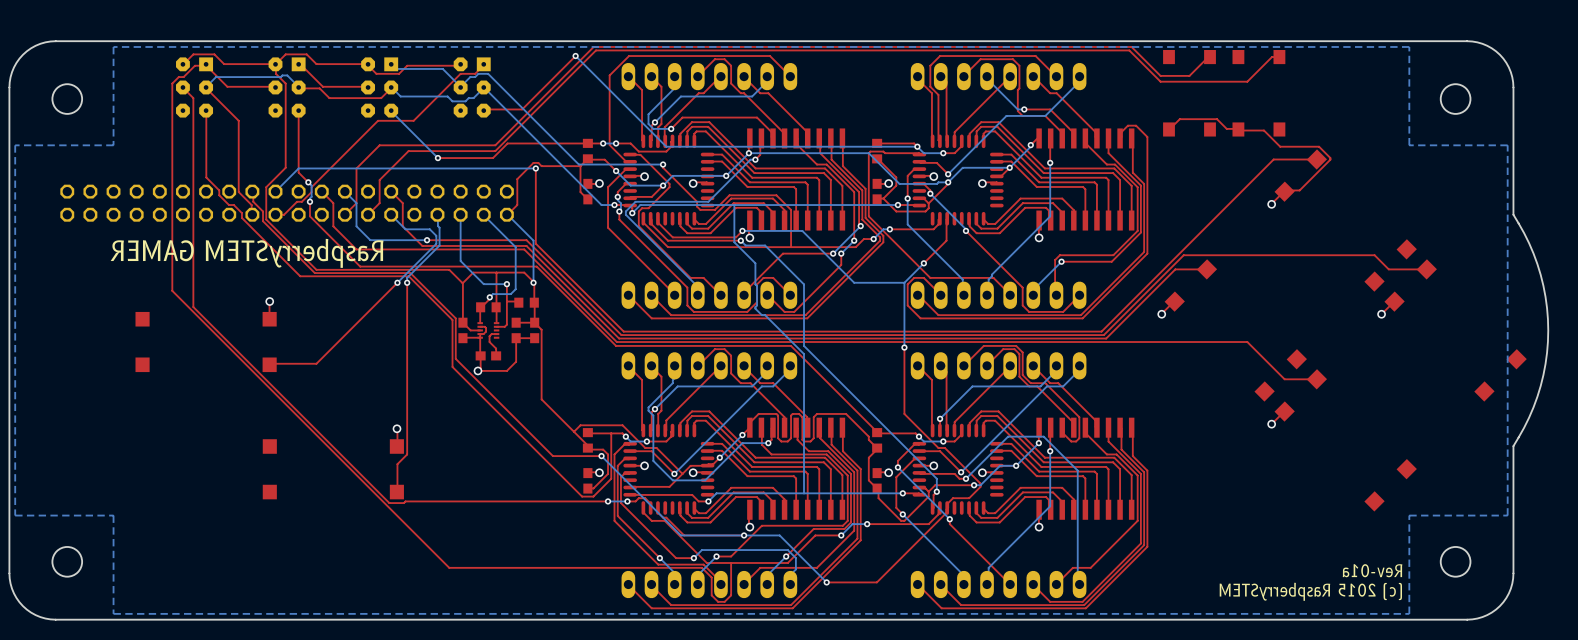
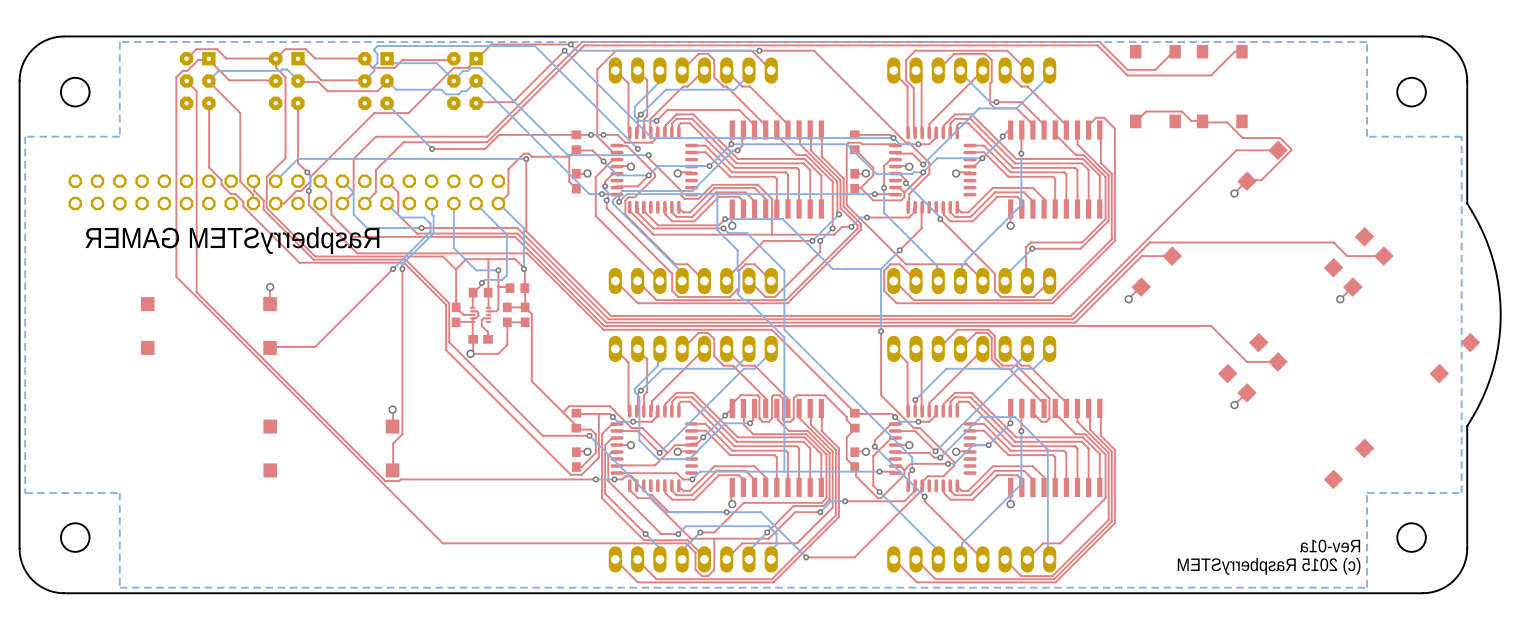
top track: none -> (570, 44) (491, 44) (475, 60)
bottom track: none -> (570, 44) (577, 50) (759, 50)
via: none -> (570, 44)
top track: none -> (759, 50) (814, 50) (906, 142) (909, 142) (929, 162) (929, 173) (909, 194) (908, 207)
via: none -> (759, 50)
bottom track: none -> (364, 81) (374, 70) (374, 66) (377, 63) (377, 53) (374, 50) (377, 46) (534, 46) (637, 148)
via: none -> (637, 148)

